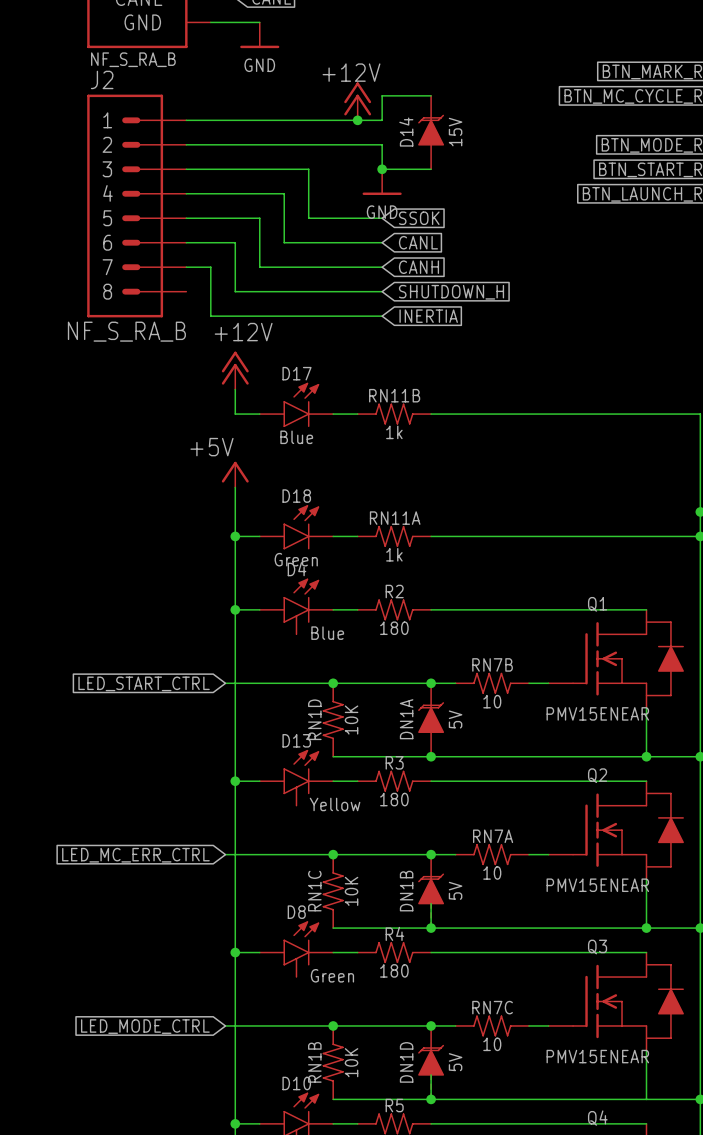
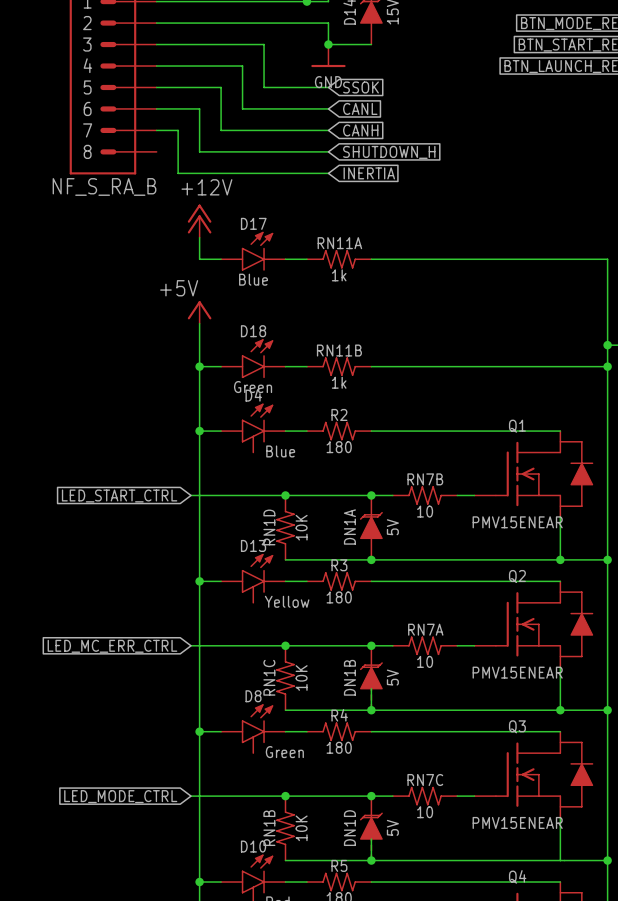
RN11B name: RN11B (394, 395) -> RN11A (339, 243)
RN11A name: RN11A (395, 518) -> RN11B (339, 350)

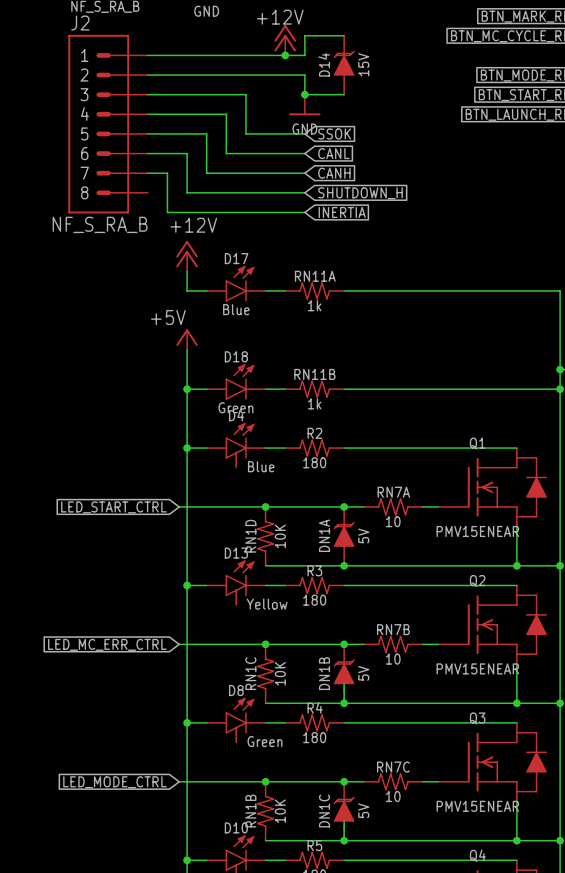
RN7B name: RN7B (425, 479) -> RN7A (393, 492)
RN7A name: RN7A (425, 629) -> RN7B (393, 629)
DN1D name: DN1D (349, 828) -> DN1C (324, 811)
junction: none -> (516, 840)

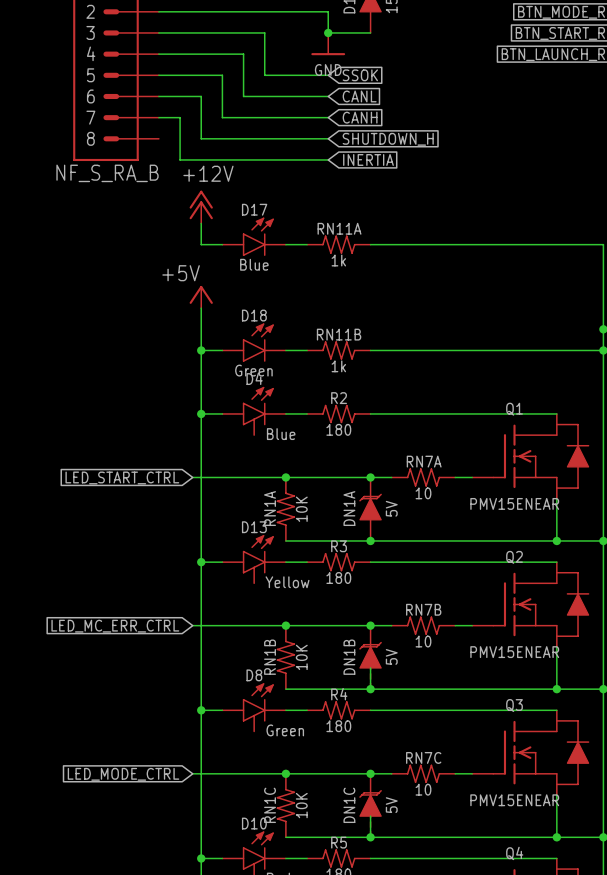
RN1D name: RN1D (250, 536) -> RN1A (270, 508)
RN1C name: RN1C (250, 673) -> RN1B (270, 657)
RN1B name: RN1B (250, 811) -> RN1C (270, 805)

